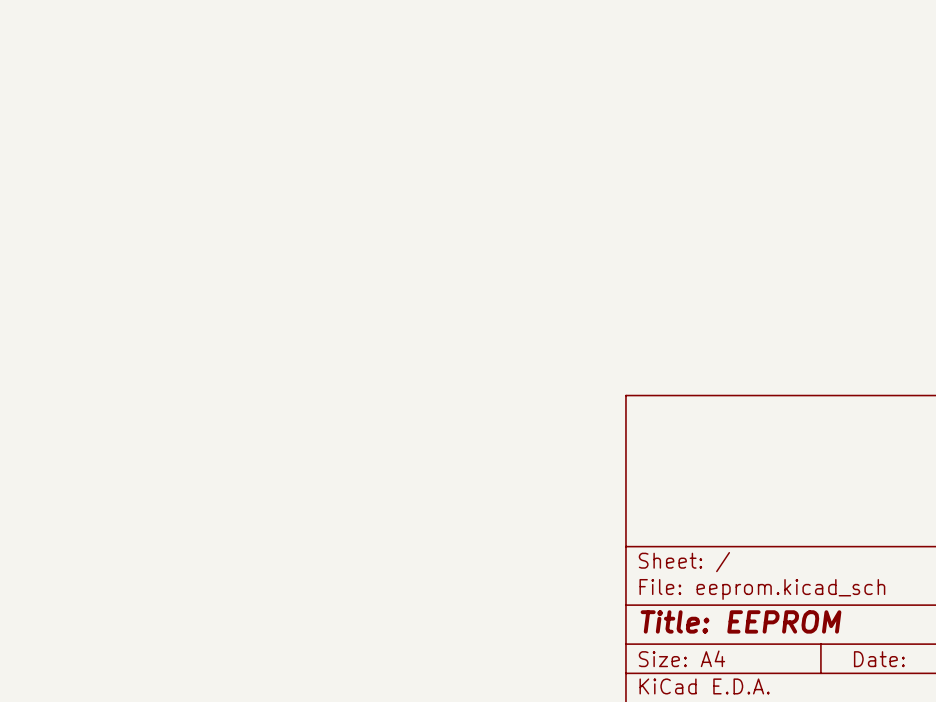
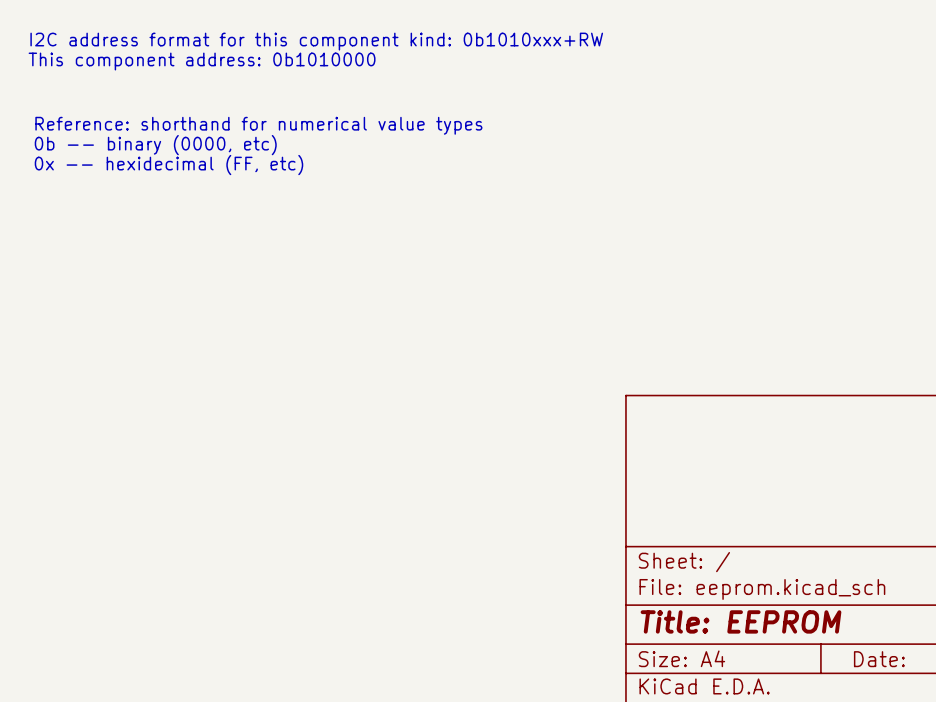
text: none -> I2C address format for this component kind: 0b1010xxx+RW (316, 41)
text: none -> This component address: 0b1010000 (202, 61)
text: none -> Reference: shorthand for numerical value types (258, 125)
text: none -> 0b -- binary (0000, etc) (155, 145)
text: none -> 0x -- hexidecimal (FF, etc) (168, 165)

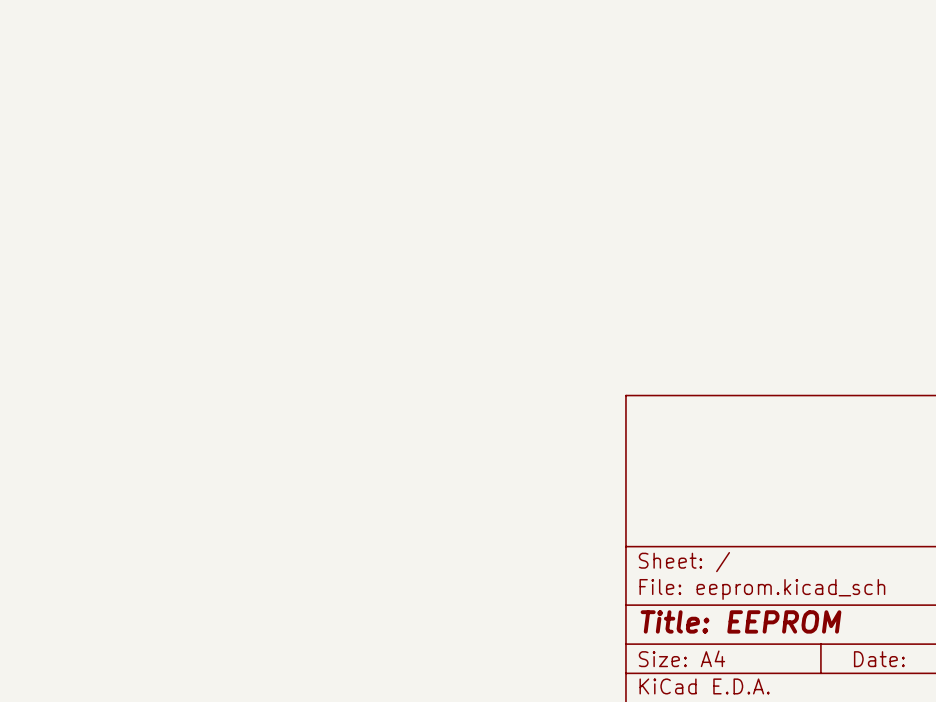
text: I2C address format for this component kind: 0b1010xxx+RW (316, 41) -> none
text: This component address: 0b1010000 (202, 61) -> none
text: Reference: shorthand for numerical value types (258, 125) -> none
text: 0b -- binary (0000, etc) (155, 145) -> none
text: 0x -- hexidecimal (FF, etc) (168, 165) -> none

